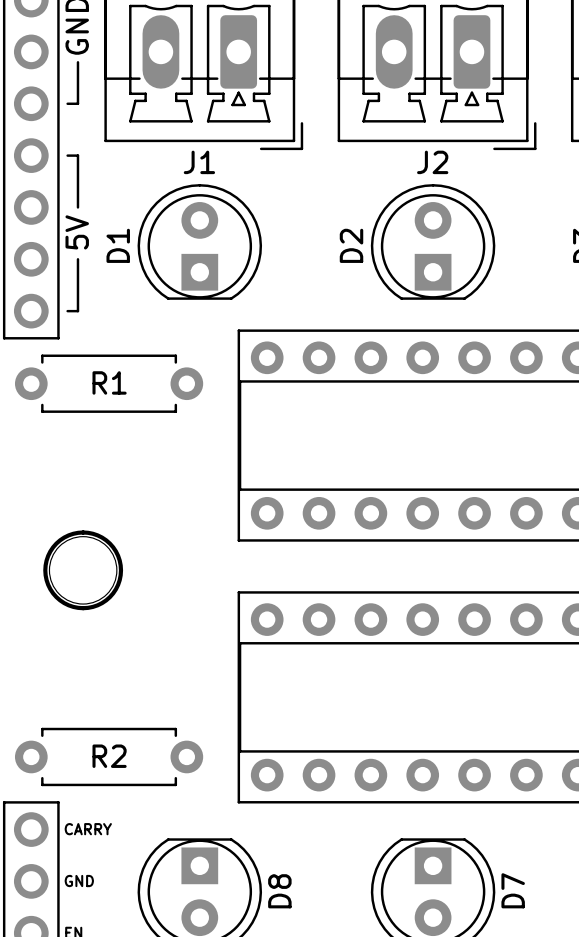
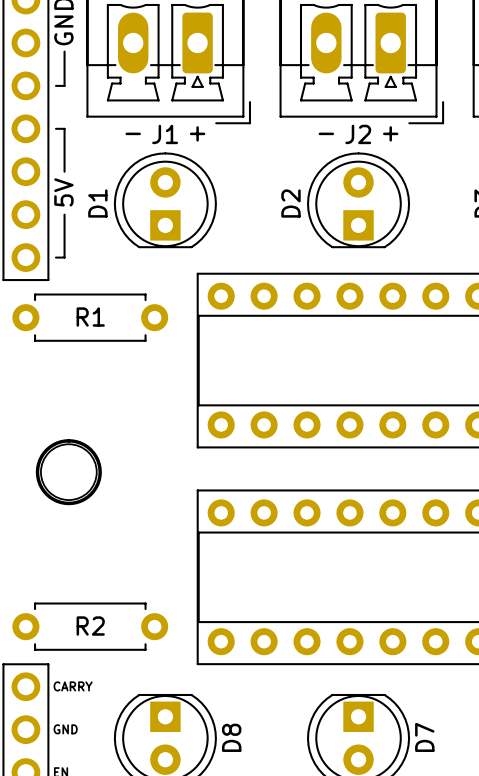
text: none -> - (133, 133)
text: none -> + (197, 133)
text: none -> - (326, 133)
text: none -> + (390, 133)

